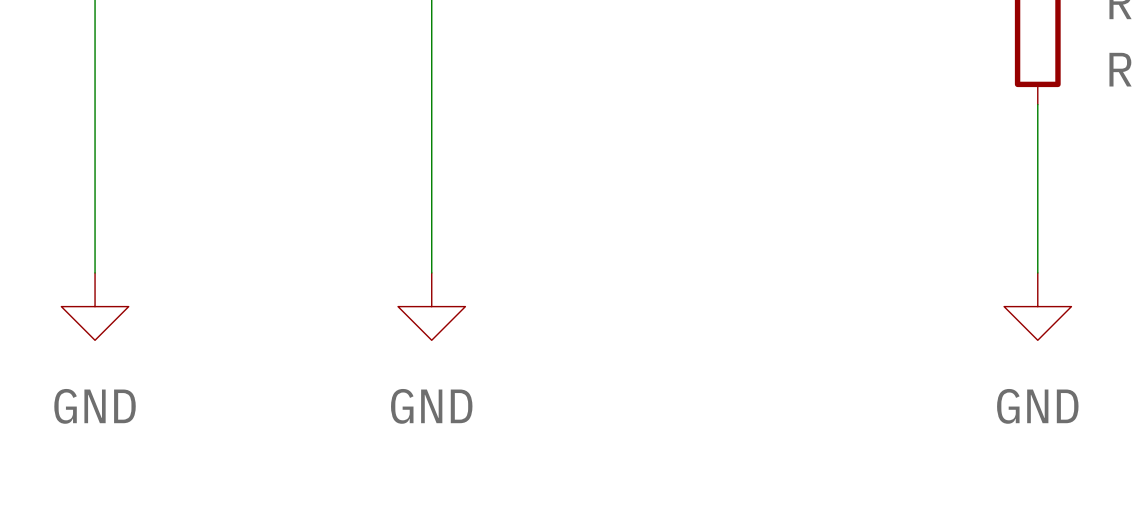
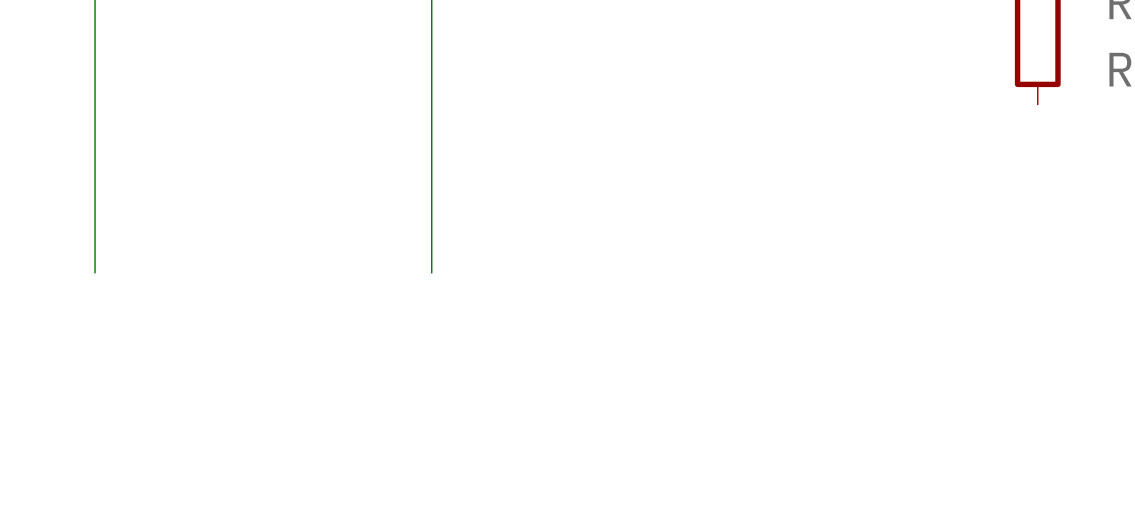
wire: (1037, 104) (1037, 272) -> none
power symbol: GND (95, 306) -> none
power symbol: GND (431, 306) -> none
power symbol: GND (1037, 306) -> none

